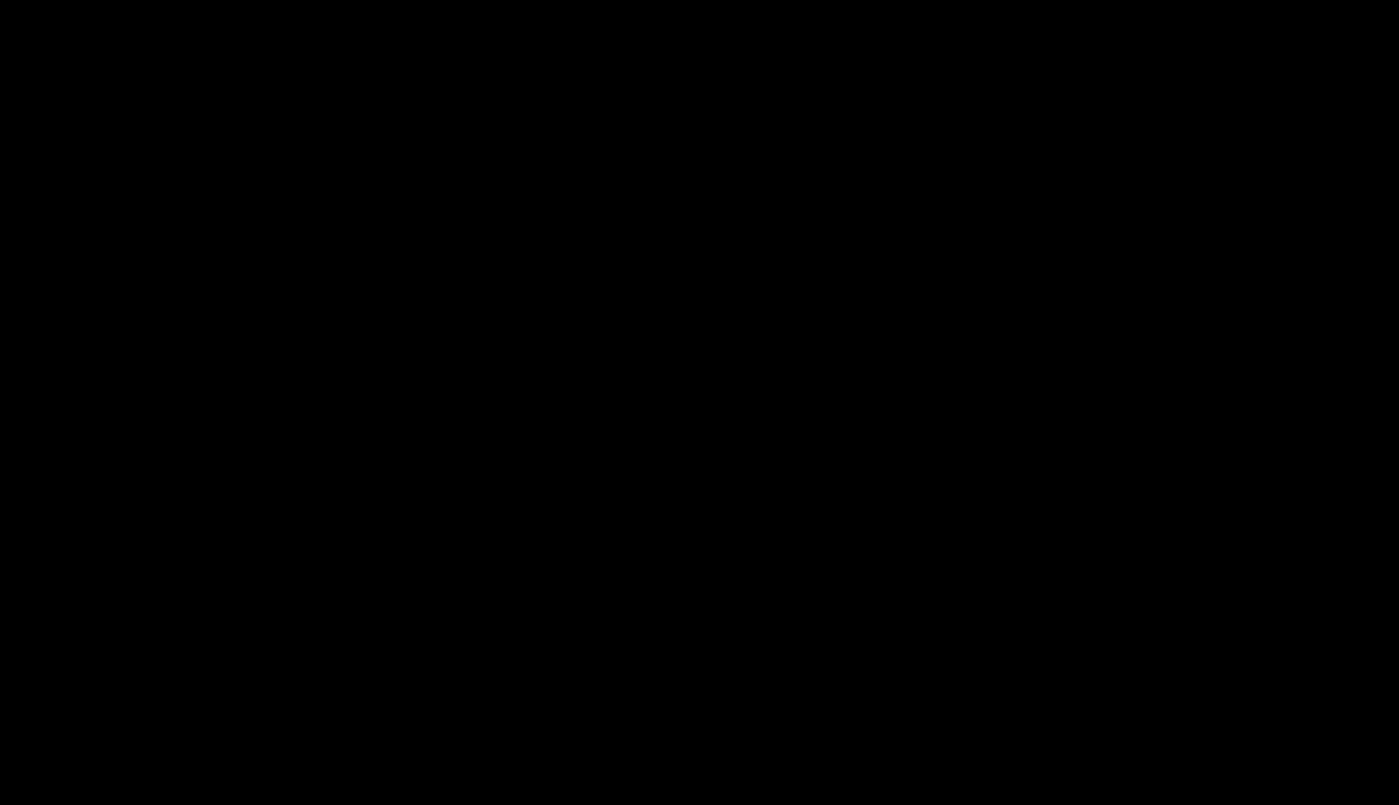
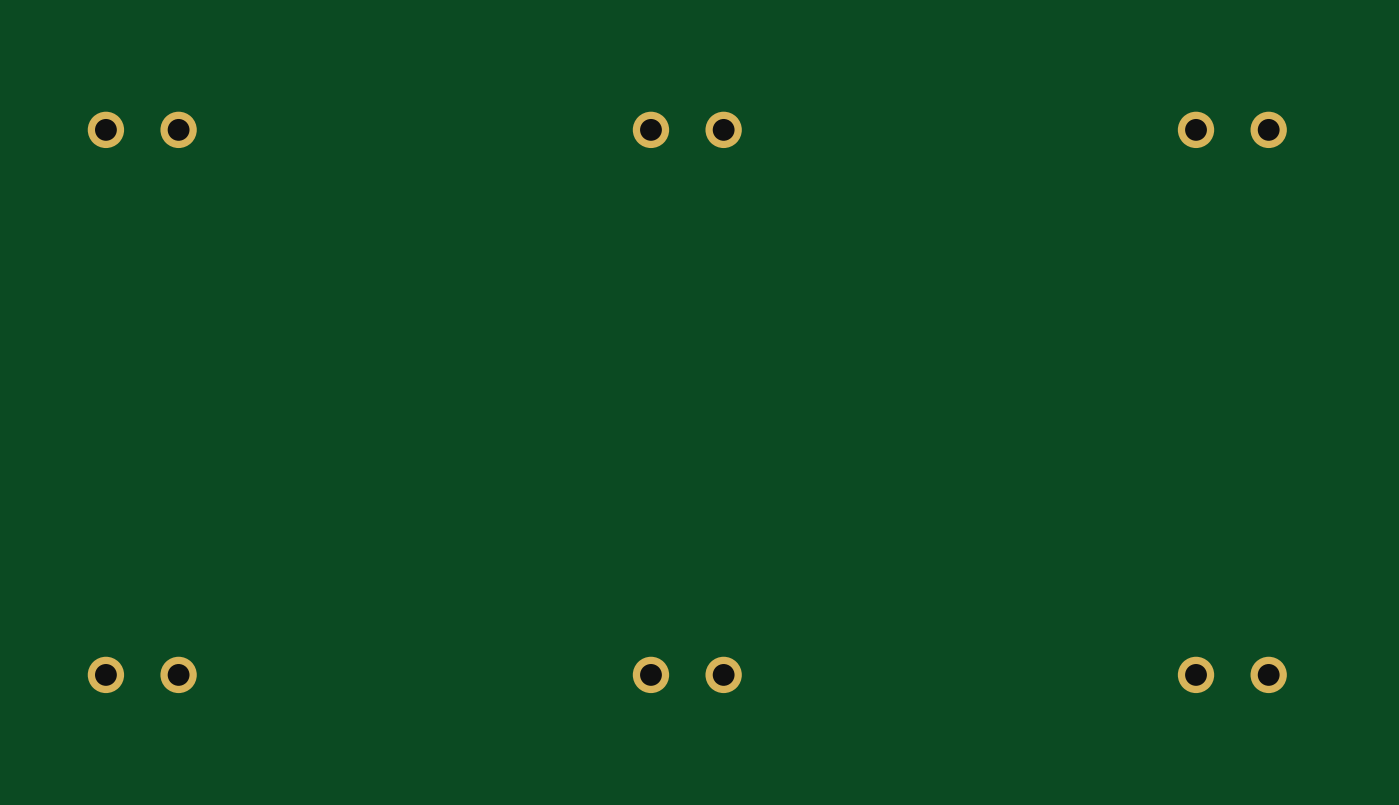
part: none -> (142, 129)
part: none -> (687, 129)
part: none -> (1232, 129)
part: none -> (142, 674)
part: none -> (687, 674)
part: none -> (1232, 674)

